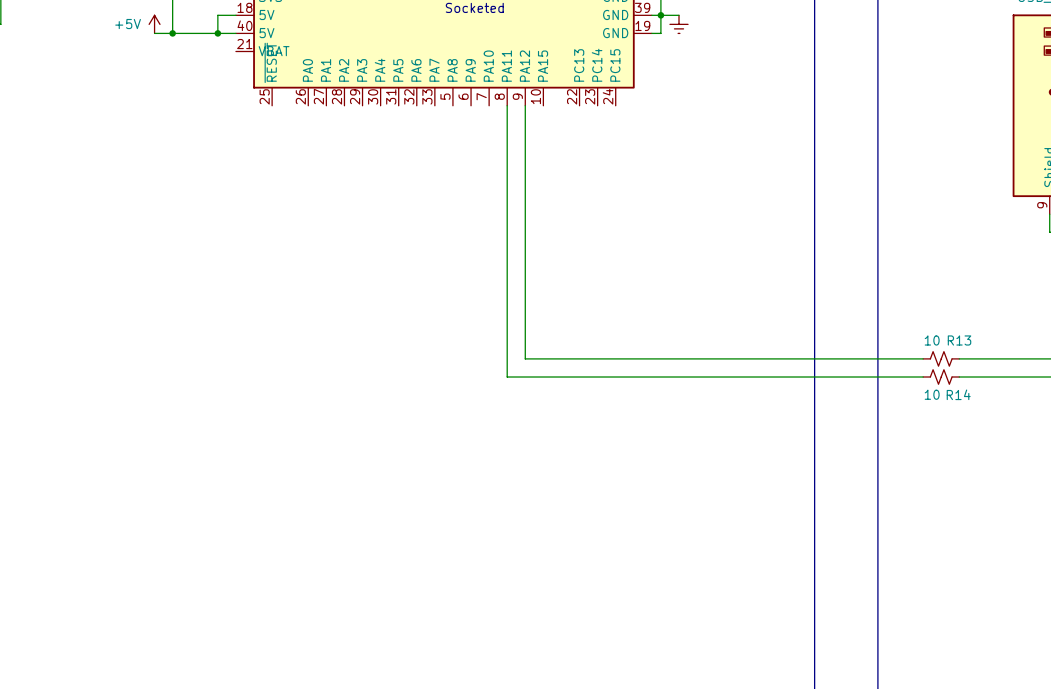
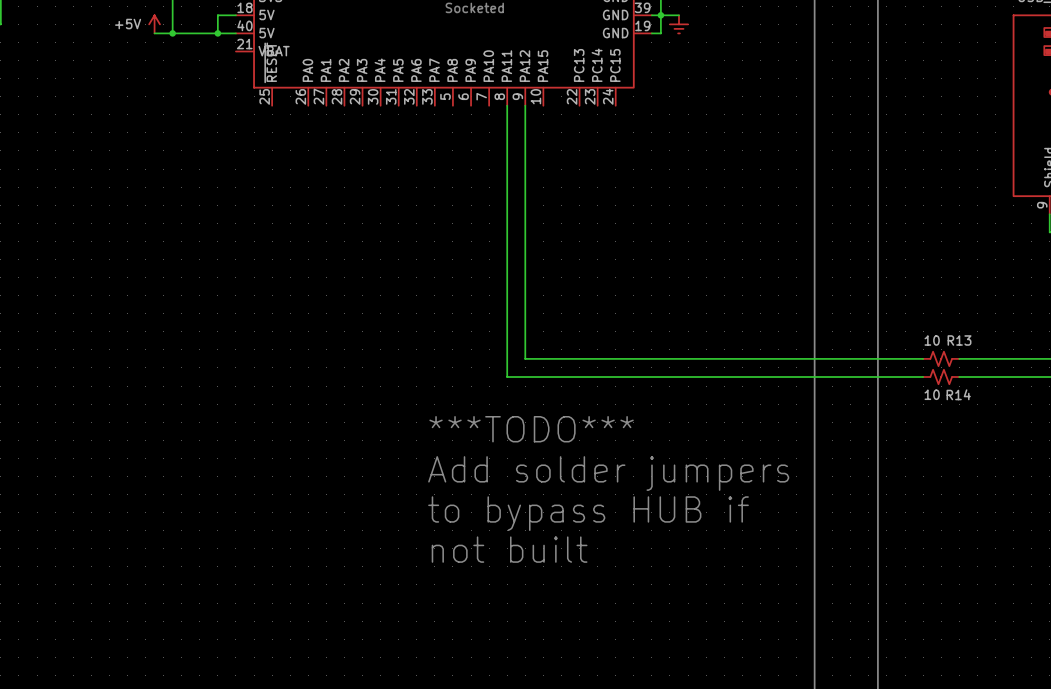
text: none -> ***TODO*** (531, 429)
text: none -> Add solder jumpers (608, 473)
text: none -> to bypass HUB if (588, 513)
text: none -> not built (509, 549)

